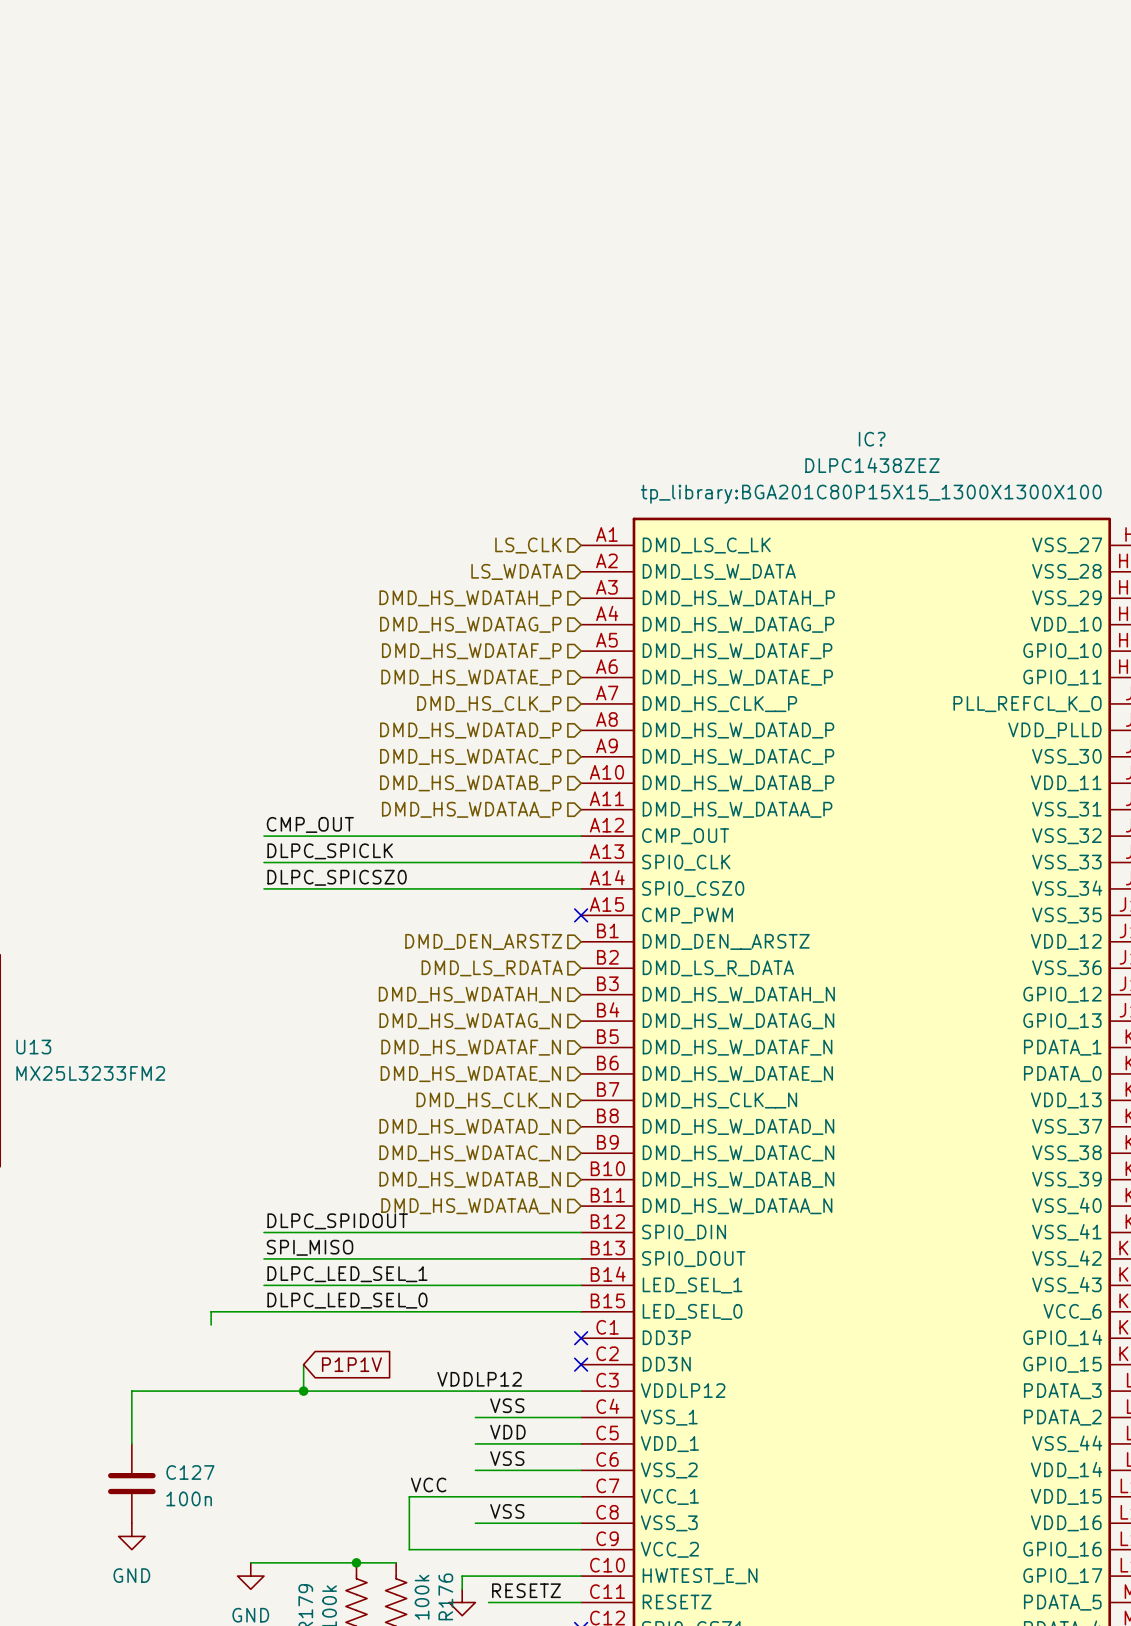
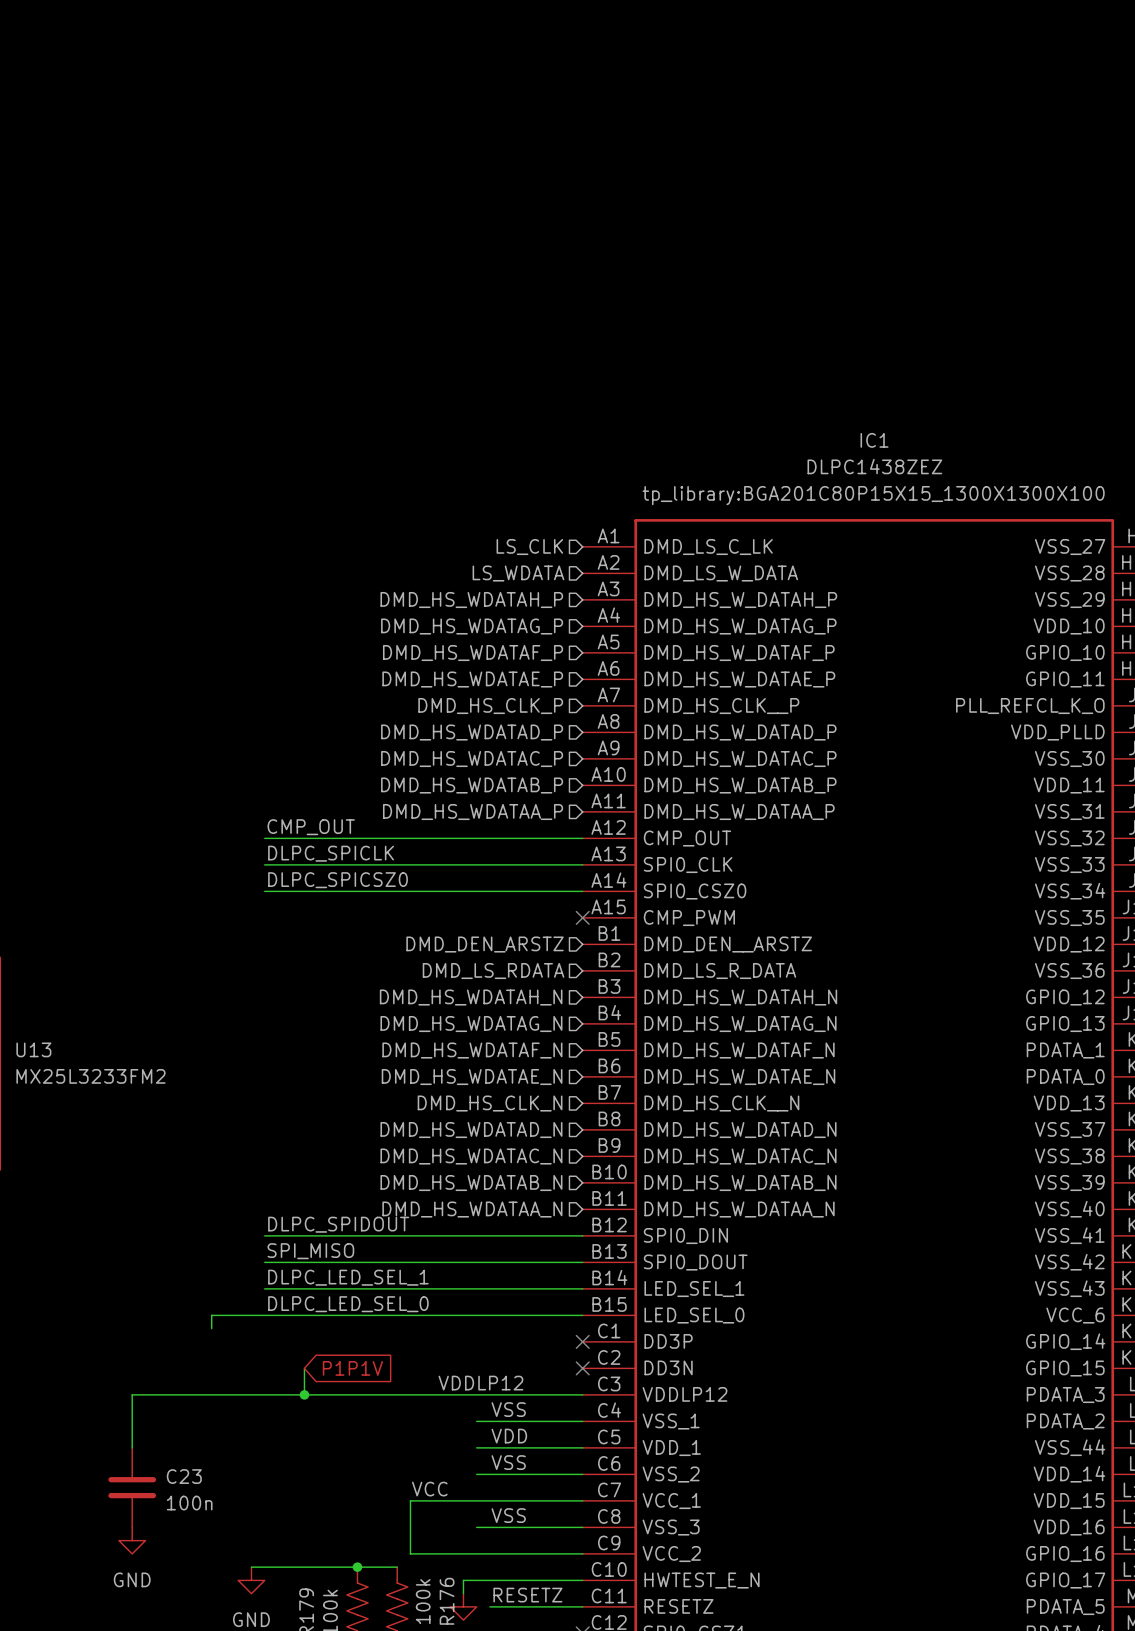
IC? name: IC? (872, 439) -> IC1 (874, 440)
C127 name: C127 (190, 1472) -> C23 (184, 1476)

